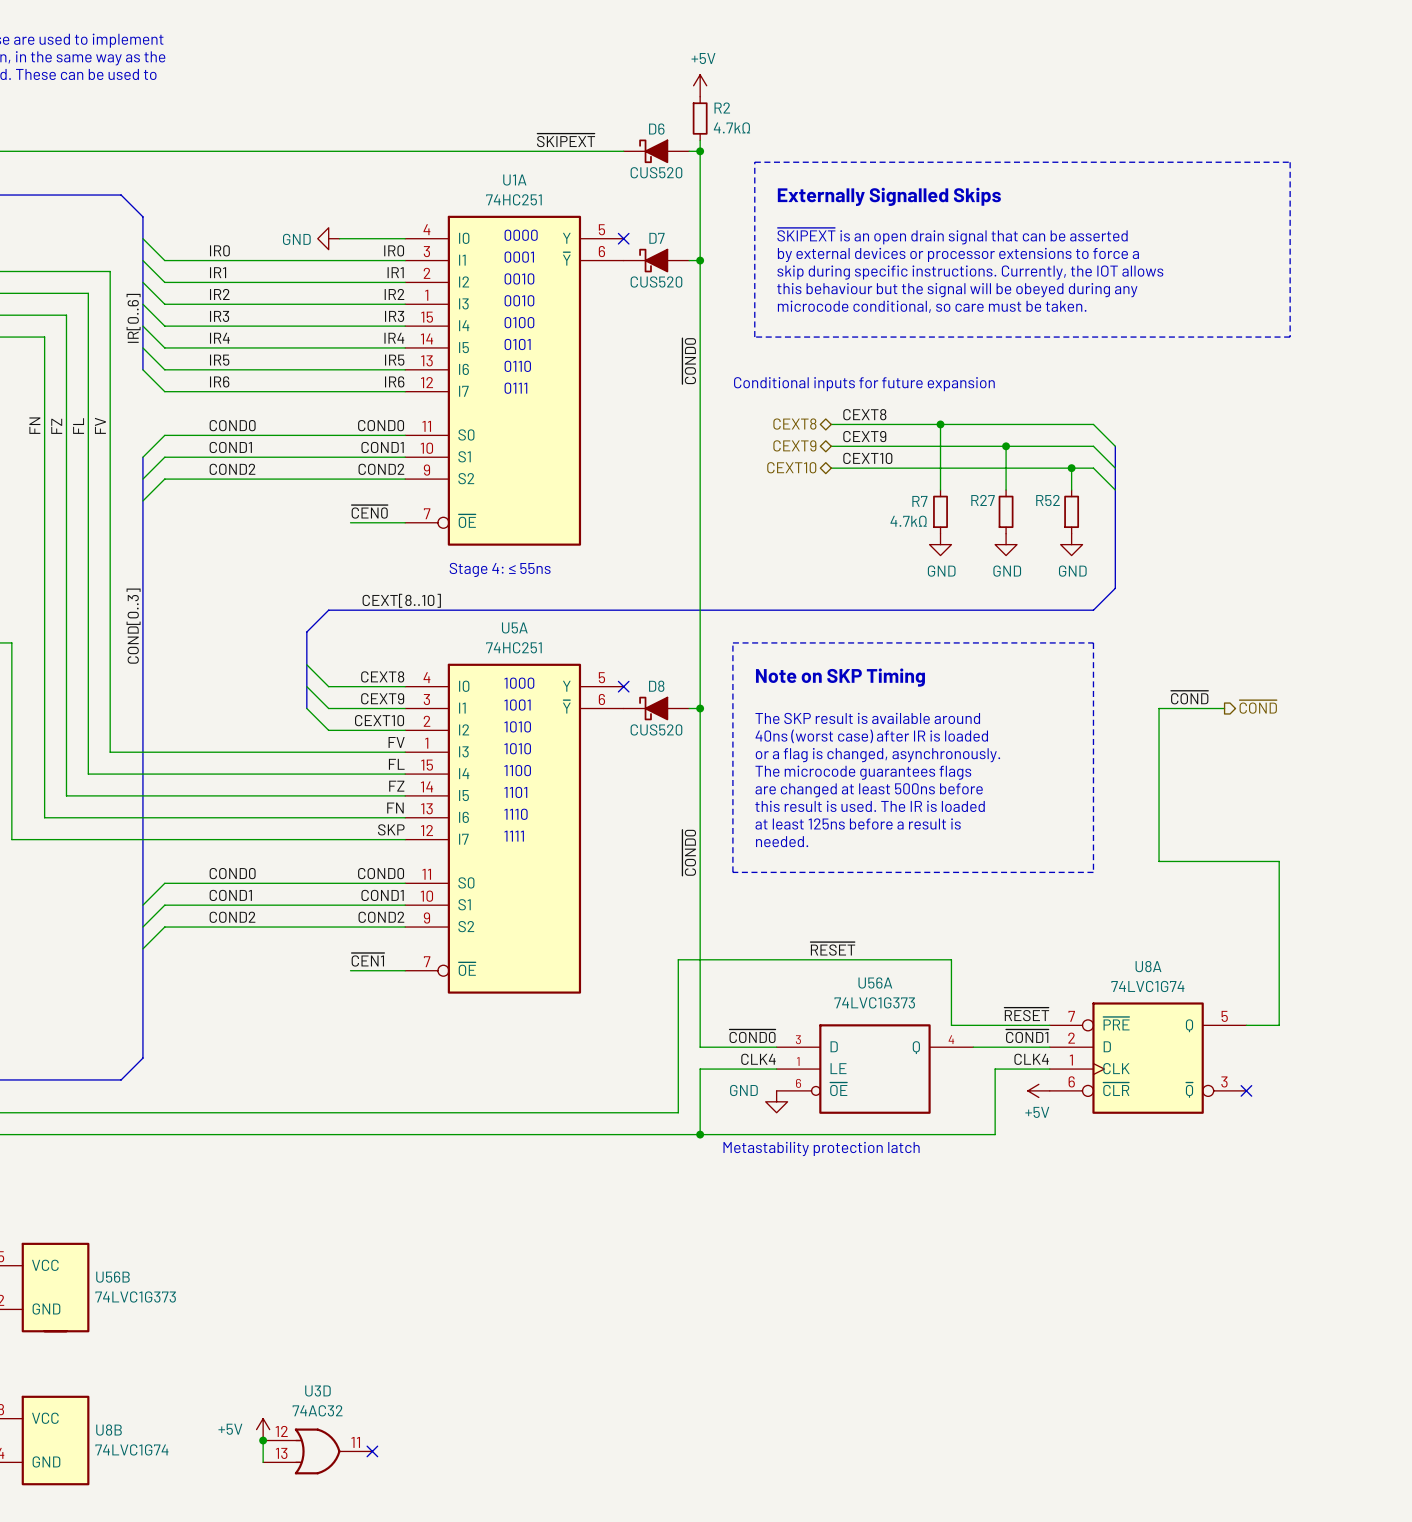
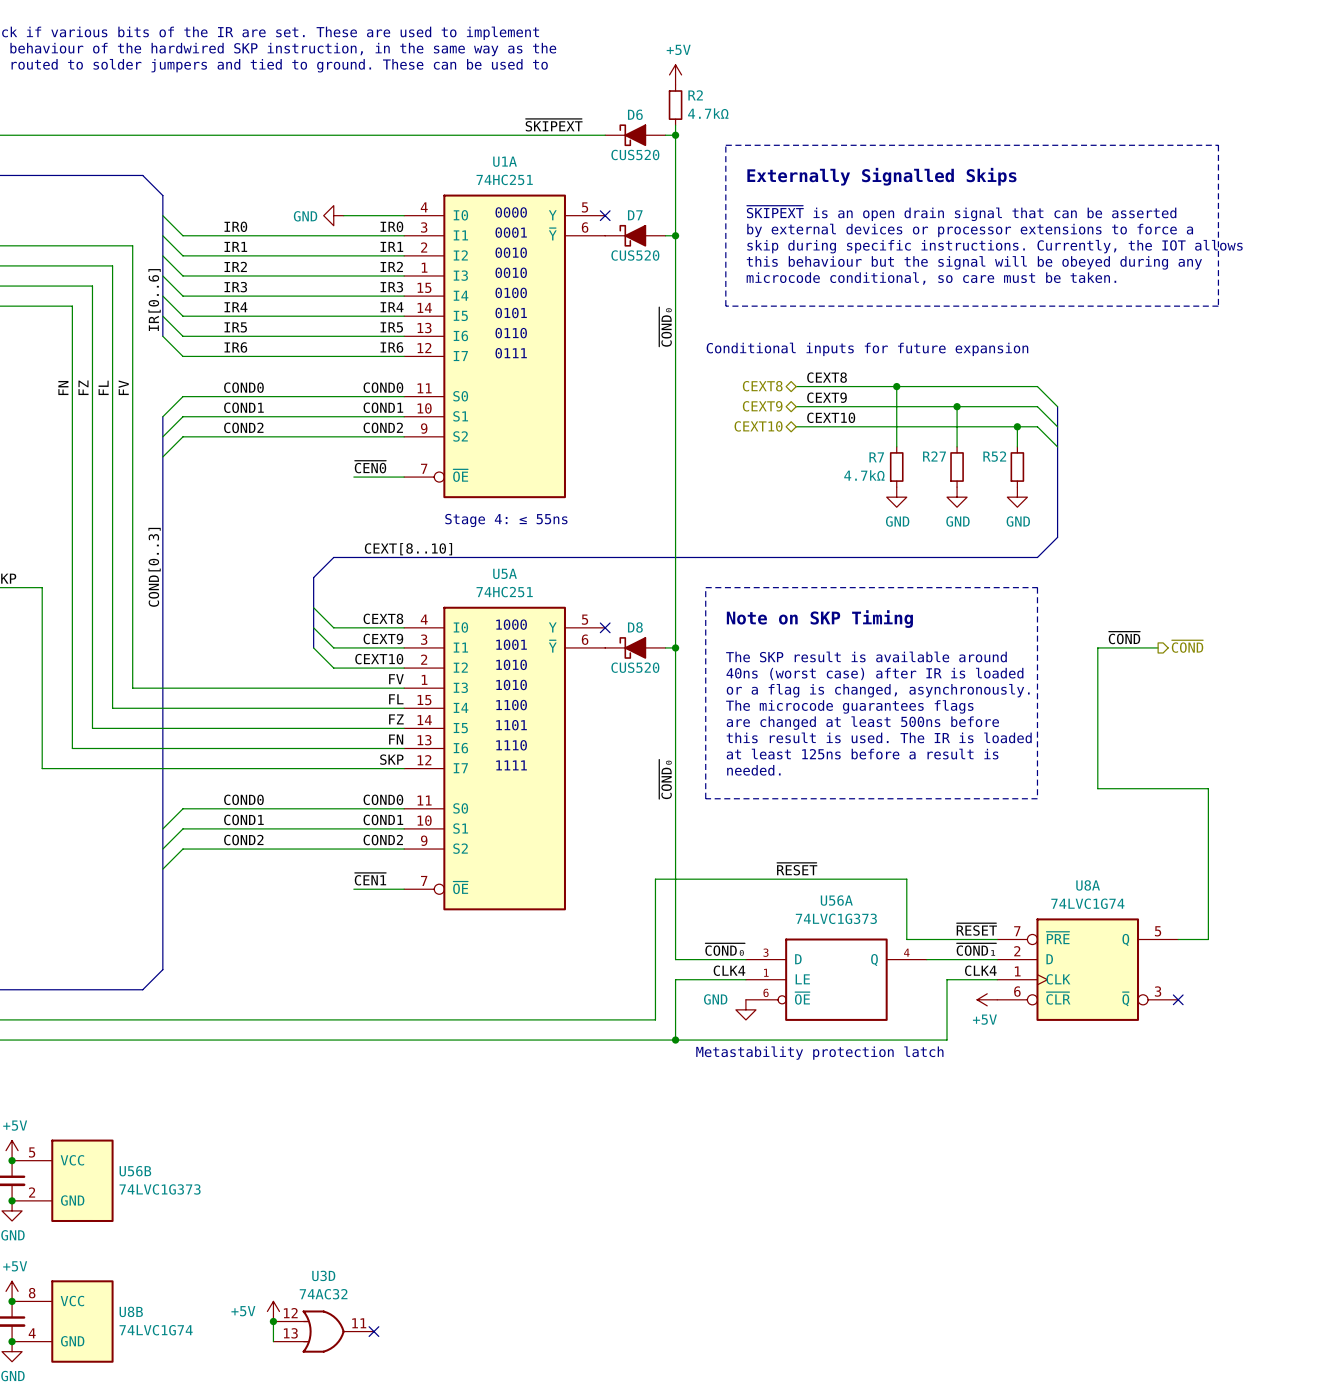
label: ~{COND0} (689, 361) -> ~{COND₀} (665, 326)
label: ~{COND0} (689, 852) -> ~{COND₀} (665, 779)
label: ~{COND0} (752, 1036) -> ~{COND₀} (725, 949)
label: ~{COND1} (1027, 1036) -> ~{COND₁} (976, 949)

